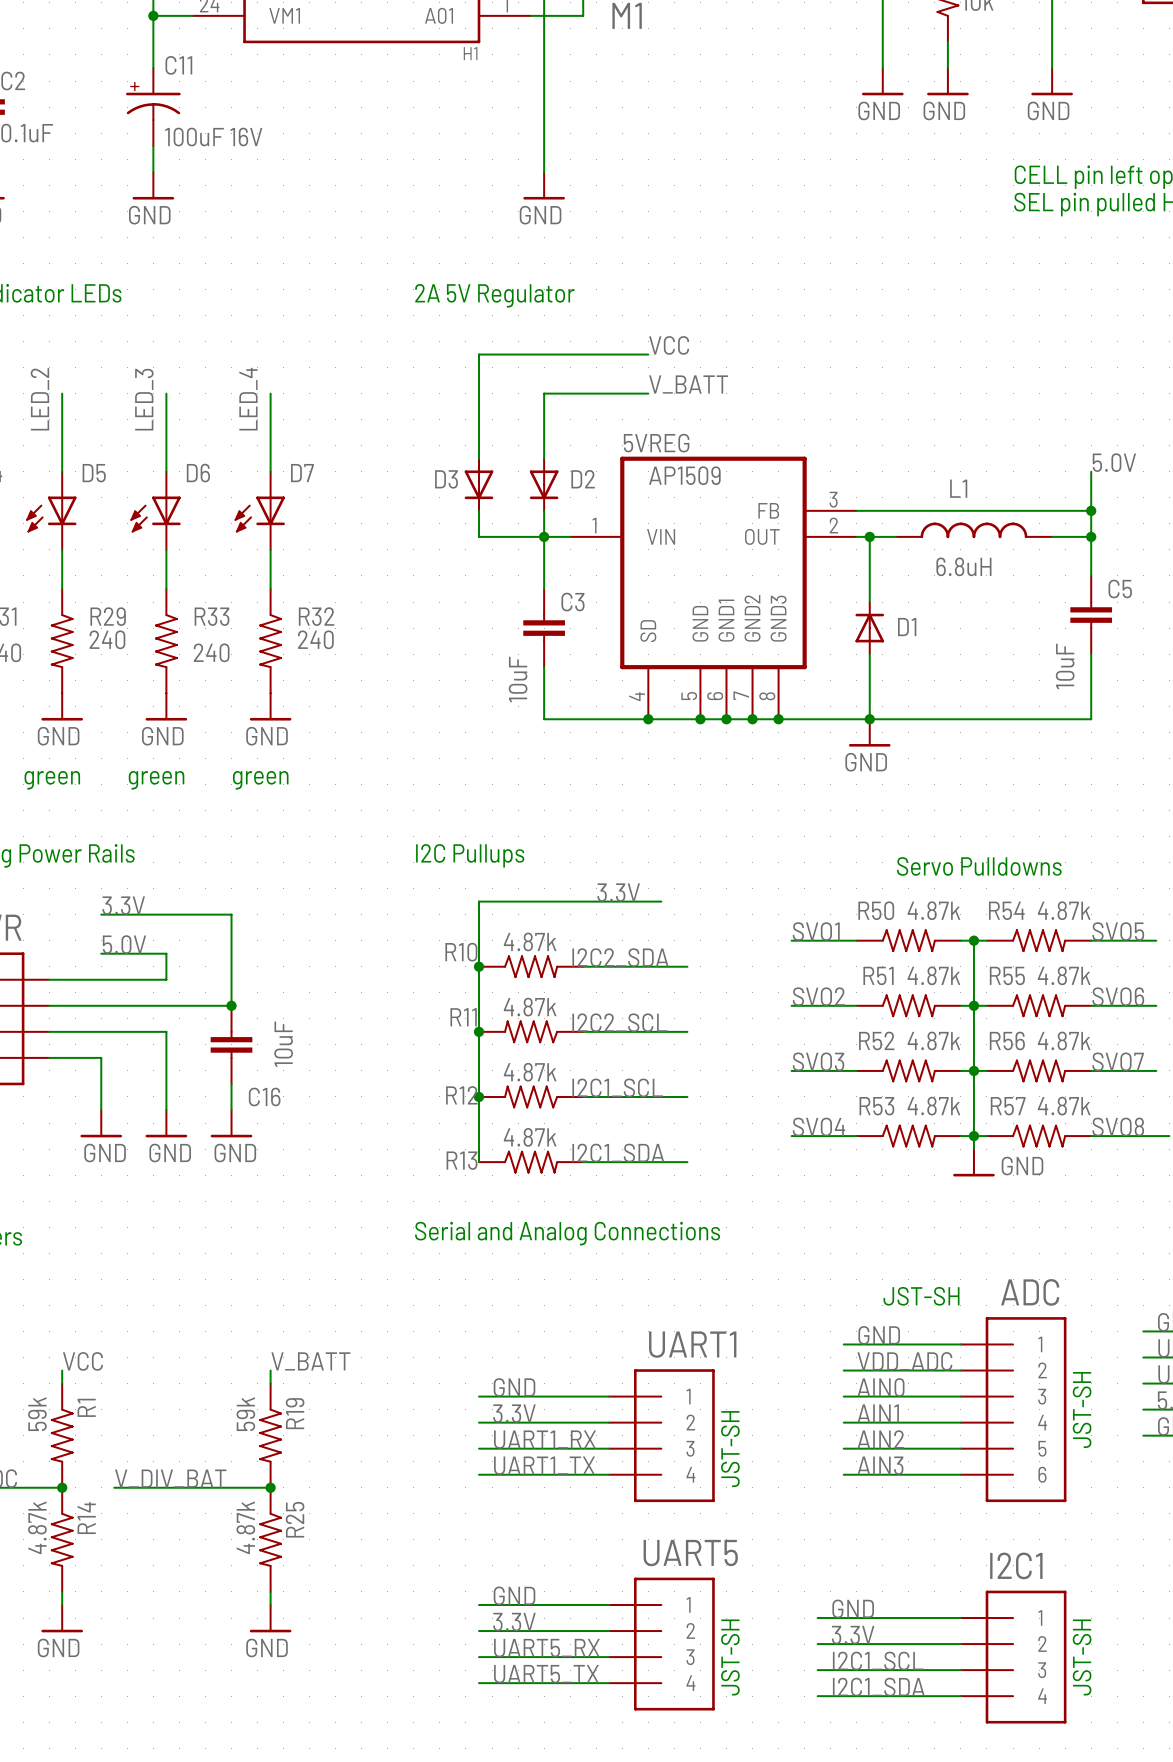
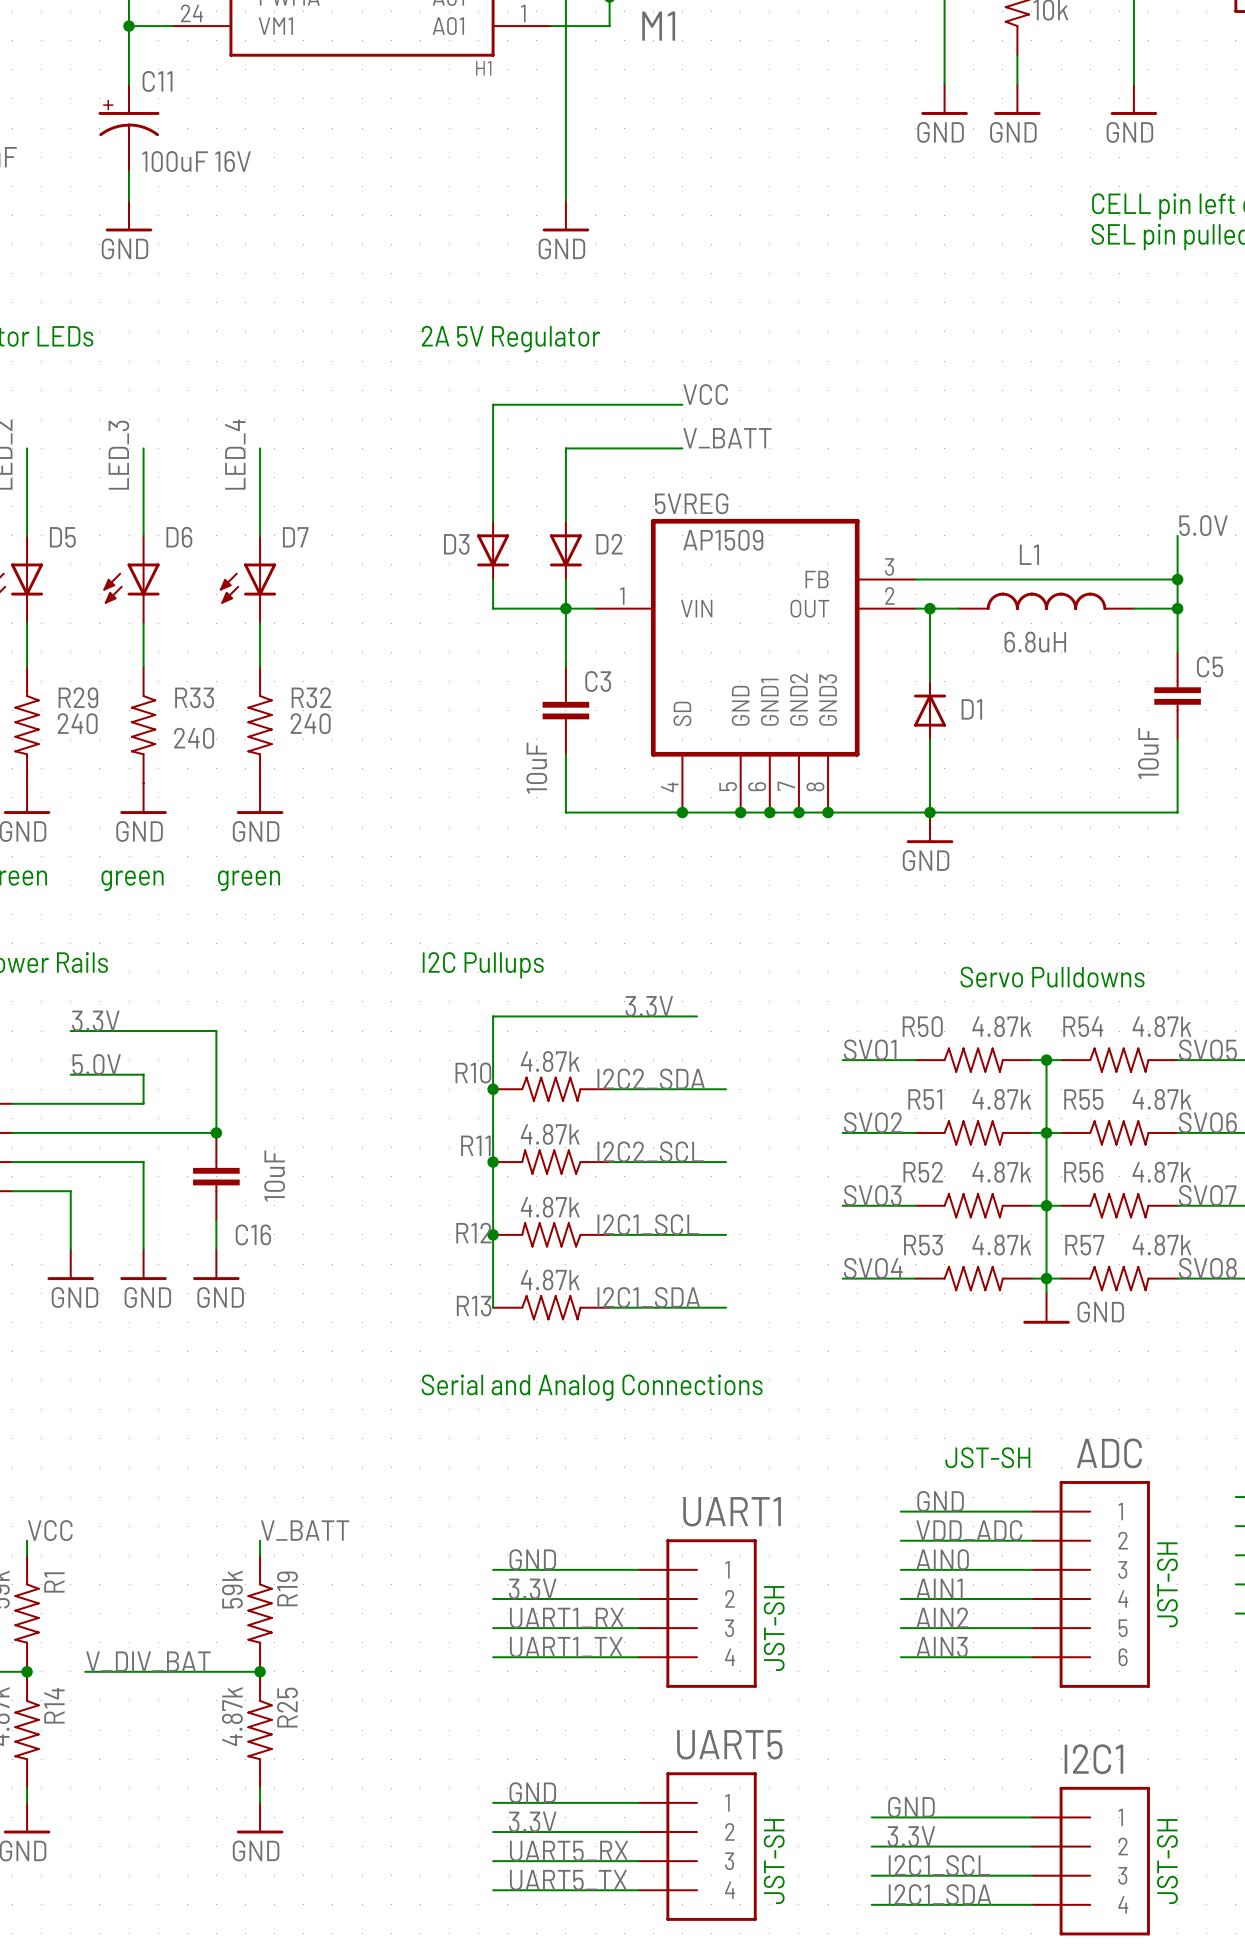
R50 name position: R50 (876, 910) -> R50 (922, 1026)
R54 value position: 4.87k (1064, 910) -> 4.87k (1161, 1026)
R51 name position: R51 (878, 975) -> R51 (925, 1099)
R55 value position: 4.87k (1064, 975) -> 4.87k (1161, 1099)
R52 name position: R52 (876, 1040) -> R52 (923, 1172)
R56 value position: 4.87k (1064, 1040) -> 4.87k (1161, 1172)
R53 name position: R53 (876, 1106) -> R53 (923, 1245)
R57 value position: 4.87k (1064, 1106) -> 4.87k (1161, 1245)

